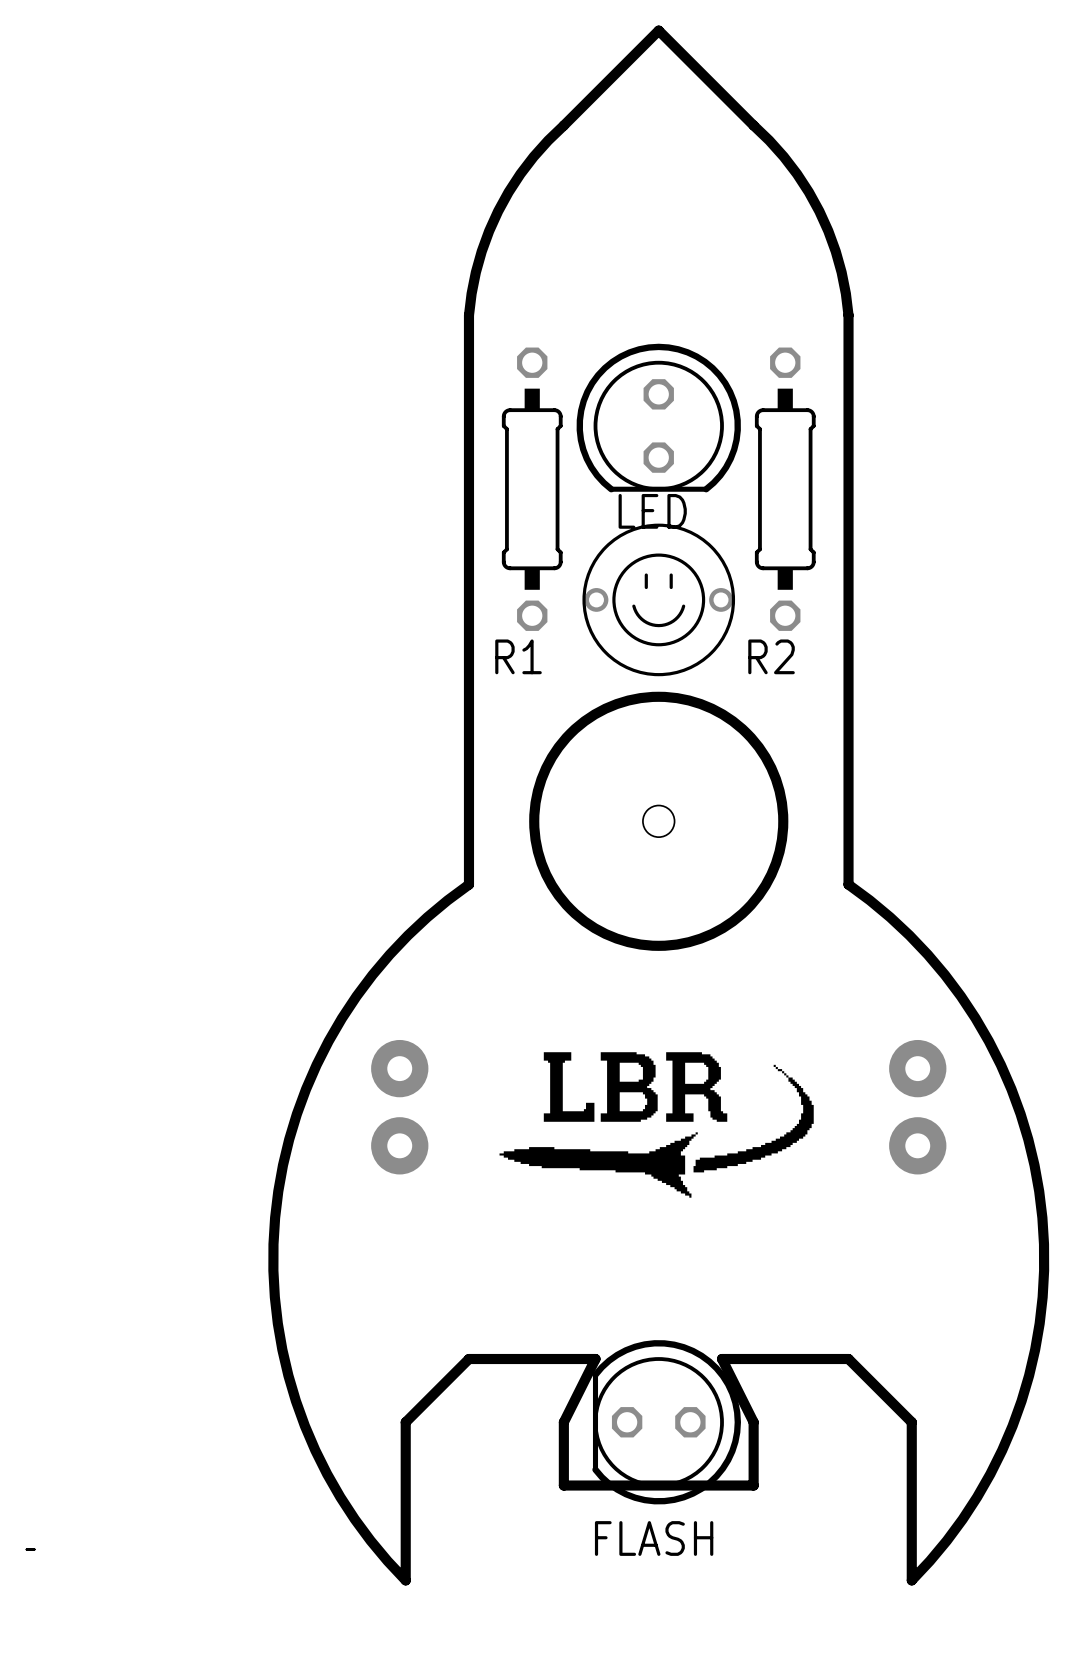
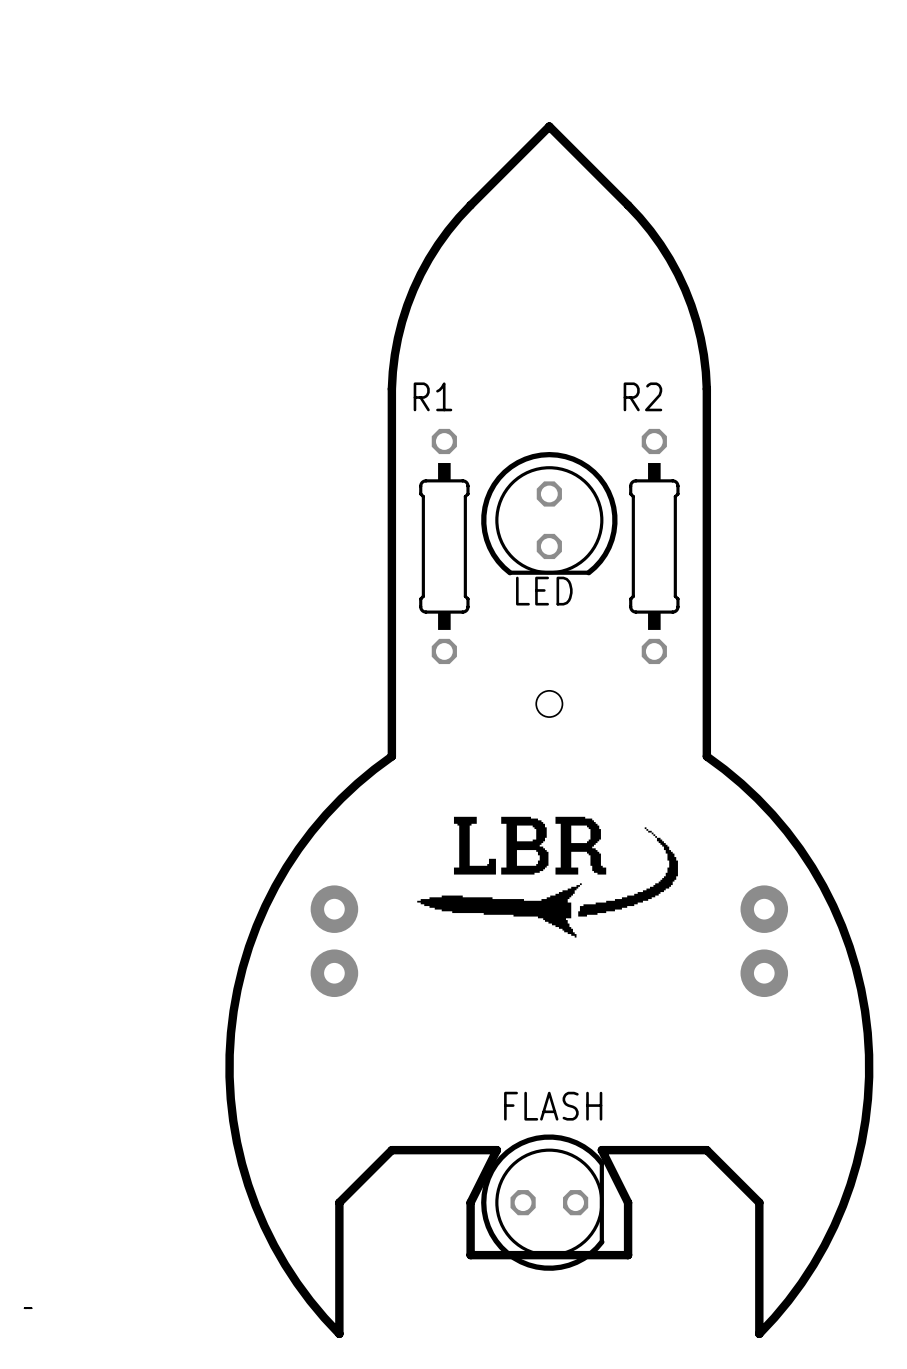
LED position: (658, 418) -> (549, 513)
board edge: (468, 441) (468, 315) (471, 293) (481, 251) (498, 211) (520, 173) (533, 156) (658, 30) (783, 156) (797, 173) (819, 211) (835, 251) (845, 293) (848, 315) (848, 441) -> (391, 388) (394, 355) (402, 321) (413, 289) (428, 259) (458, 217) (549, 126) (639, 217) (669, 259) (685, 289) (696, 321) (703, 355) (706, 388)
R1 position: (532, 489) -> (444, 546)
R2 position: (785, 489) -> (654, 546)
part: (658, 599) -> none
R1 name position: R1 (518, 656) -> R1 (432, 396)
R2 name position: R2 (771, 656) -> R2 (642, 396)
drawing: [529, 691, 789, 951] -> none
drawing position: (656, 1124) -> (547, 877)
FLASH rotation: 0° (666, 1422) -> 180° (542, 1202)

